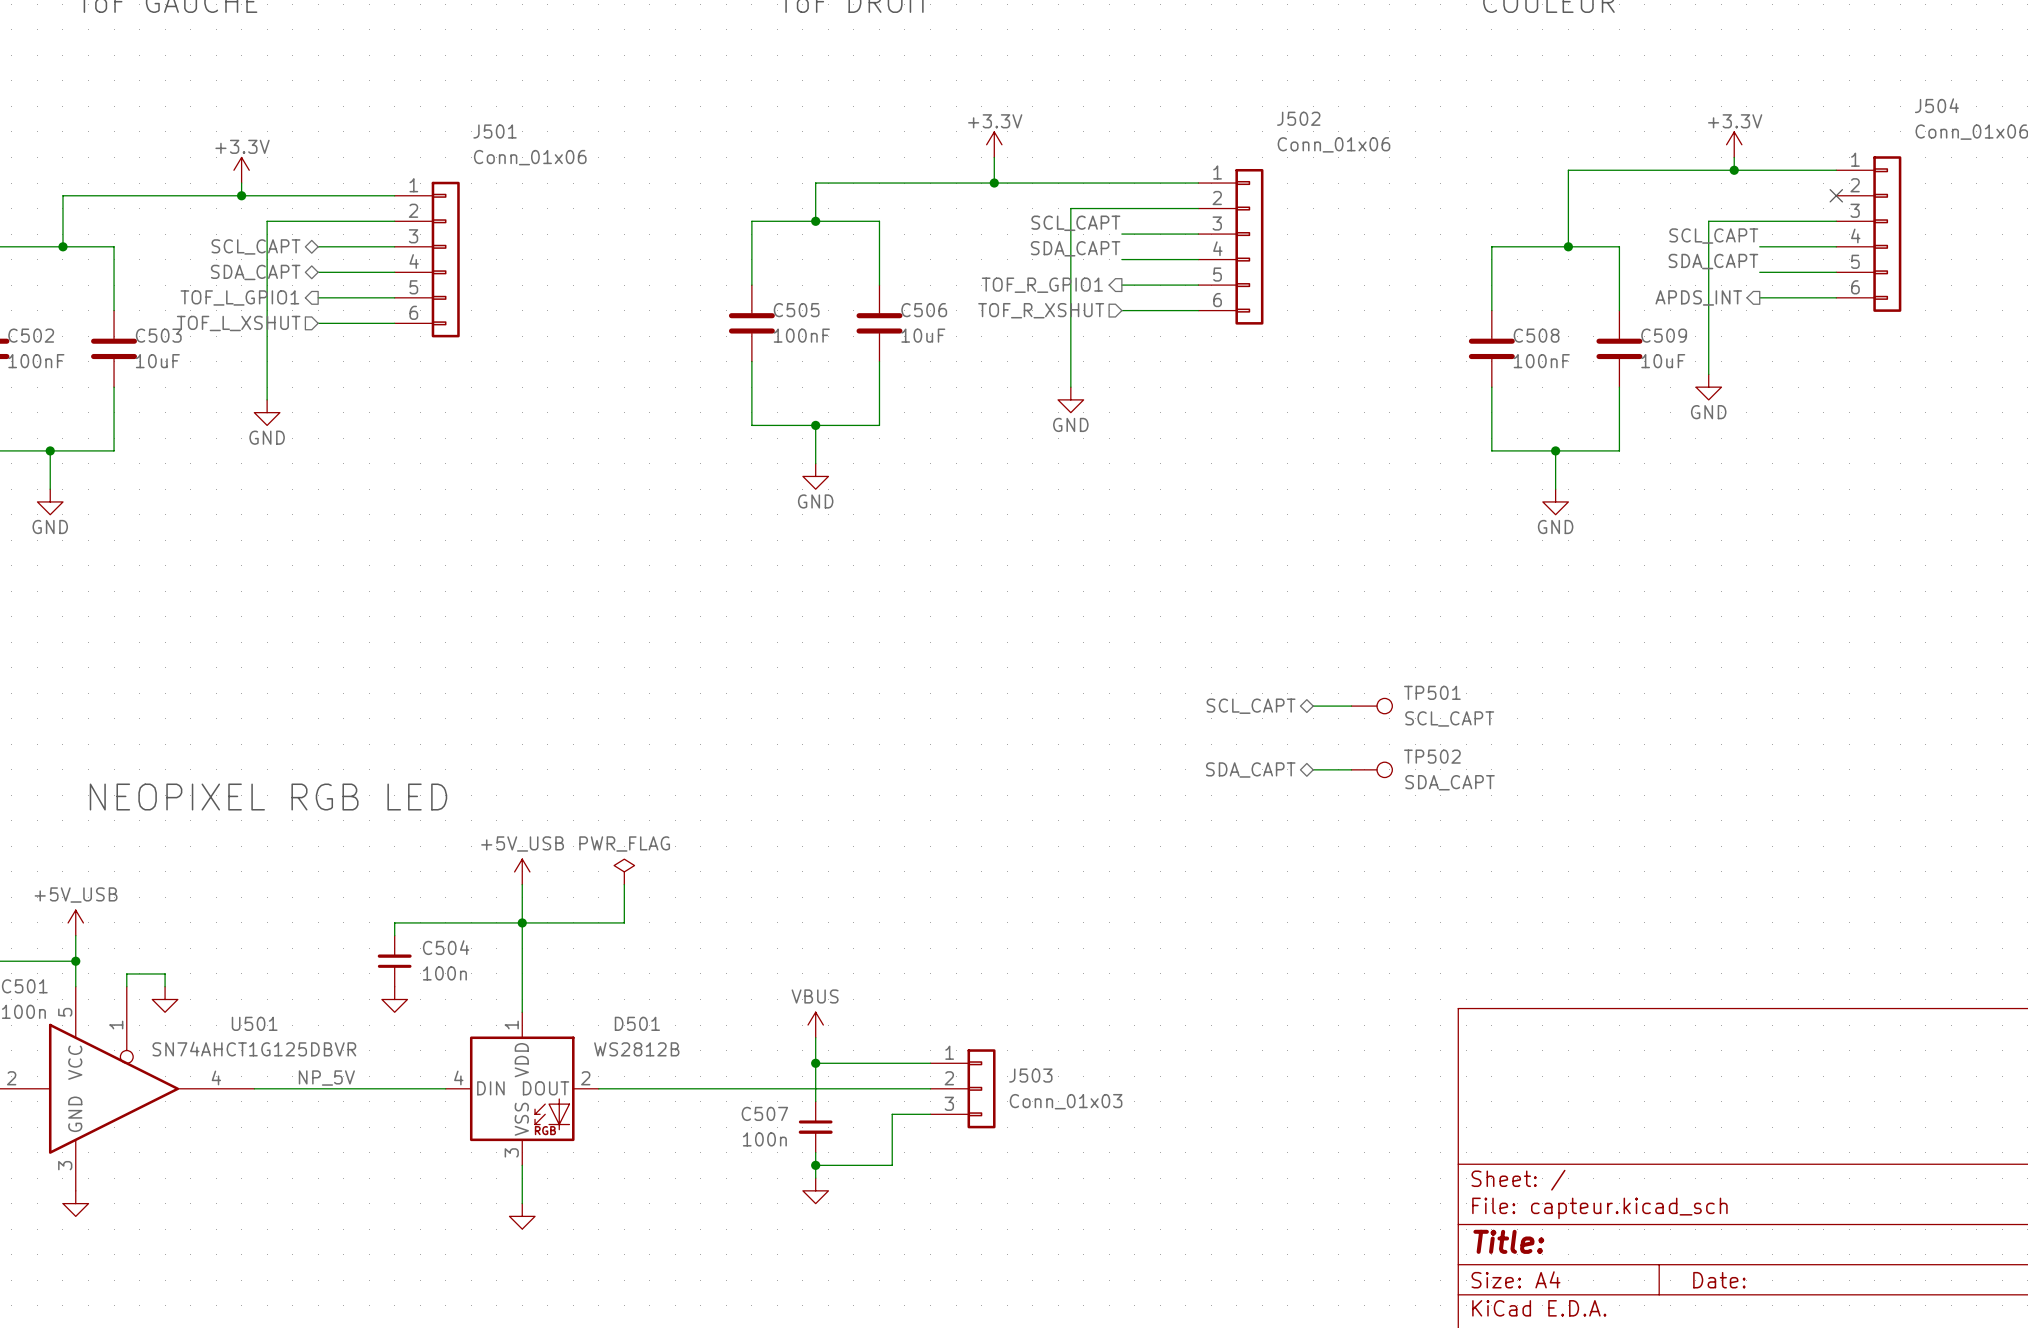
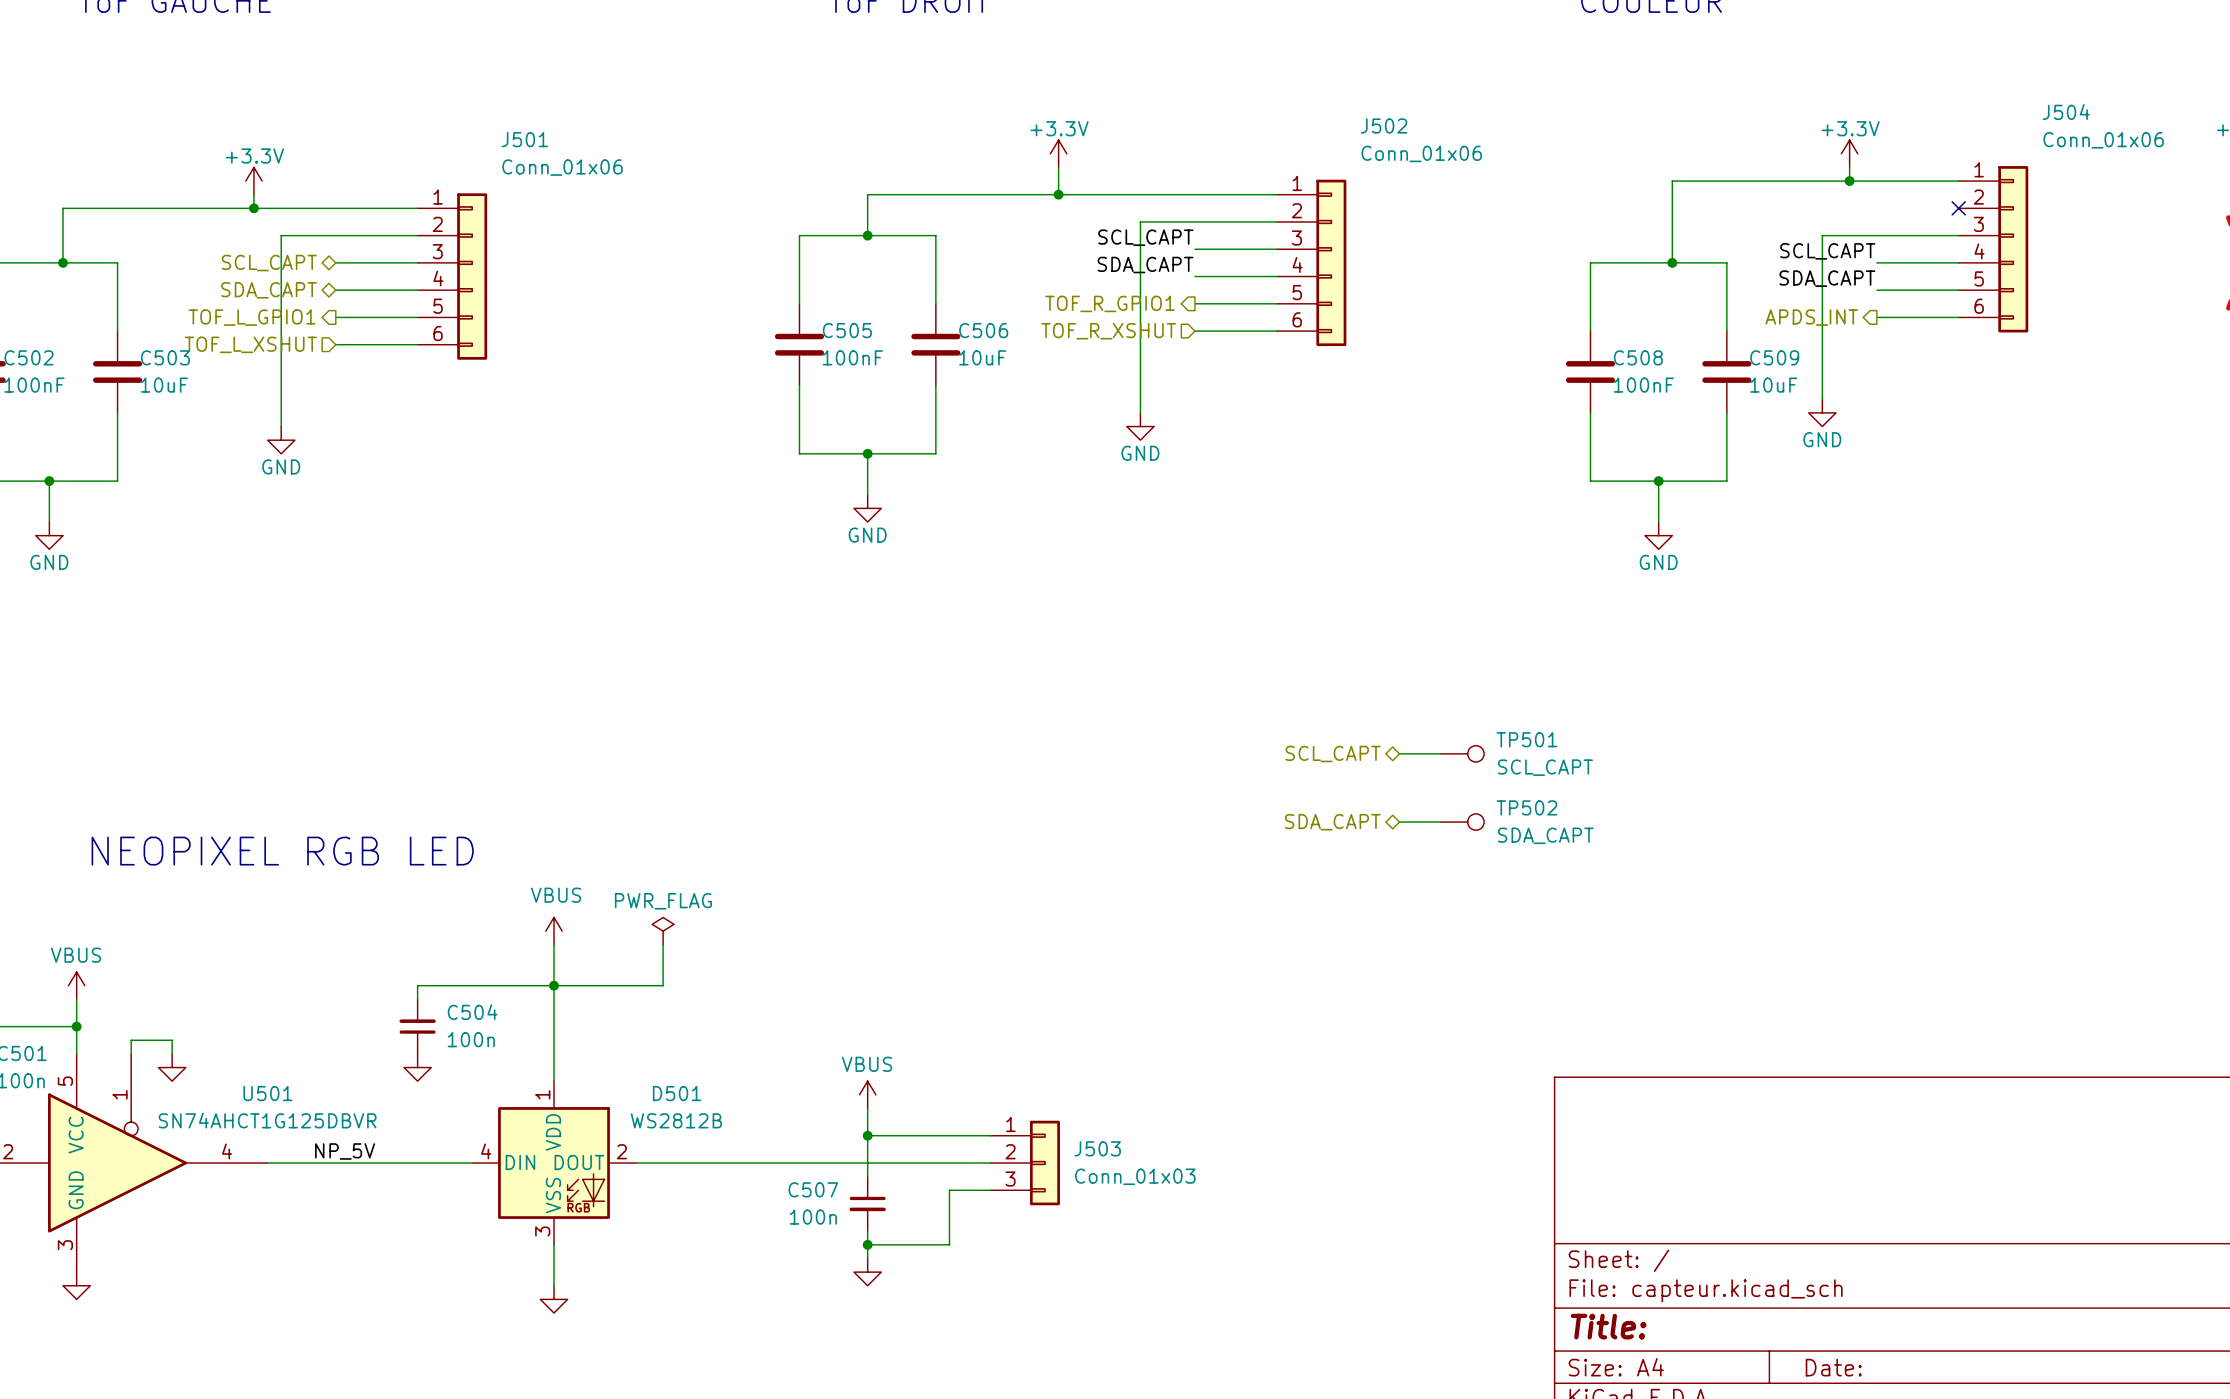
power symbol: +5V_USB (522, 871) -> VBUS (553, 931)
power symbol: +5V_USB (75, 922) -> VBUS (76, 985)

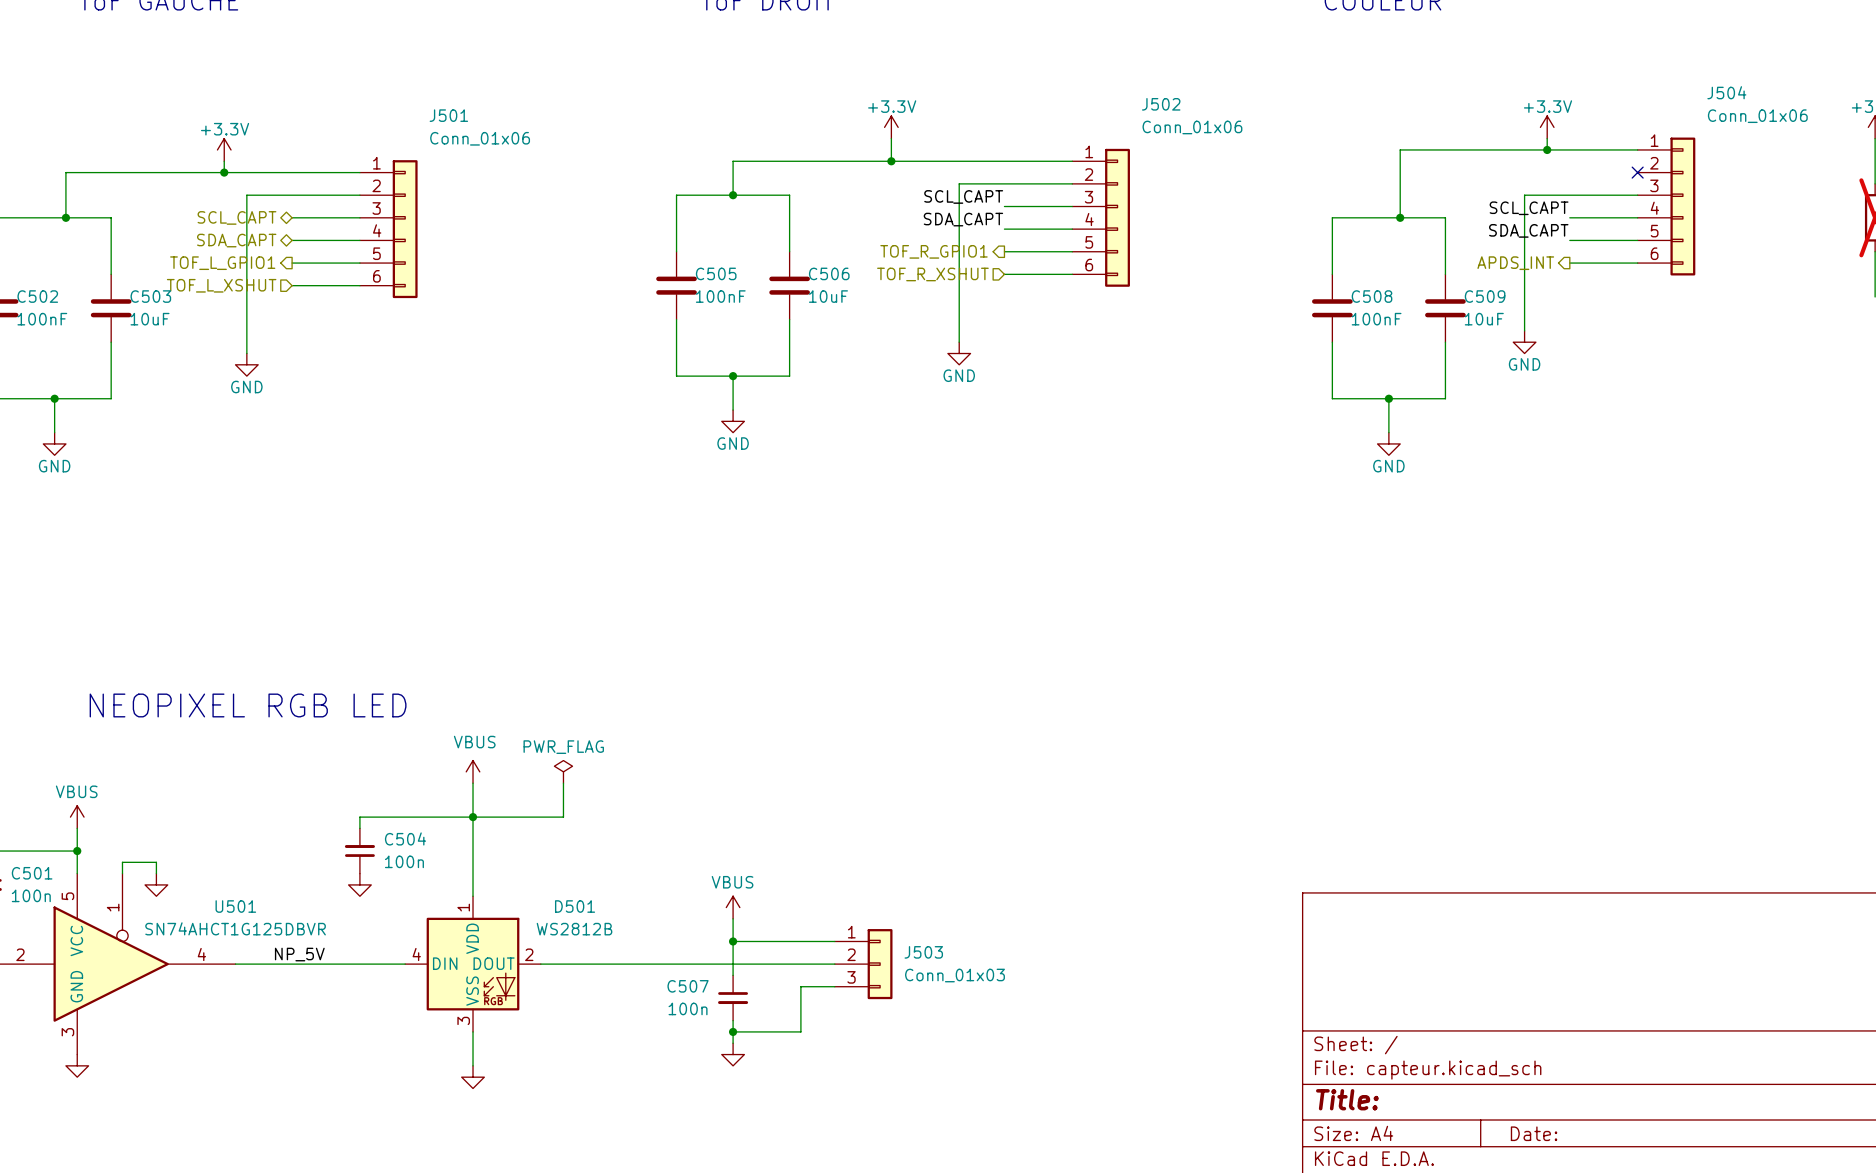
wire: (1399, 753) (1440, 753) -> none
TP501: SCL_CAPT (1462, 753) -> none
hierarchical label: SCL_CAPT (1333, 754) -> none
hierarchical label: SDA_CAPT (1332, 822) -> none
wire: (1399, 822) (1440, 822) -> none
TP502: SDA_CAPT (1462, 822) -> none

